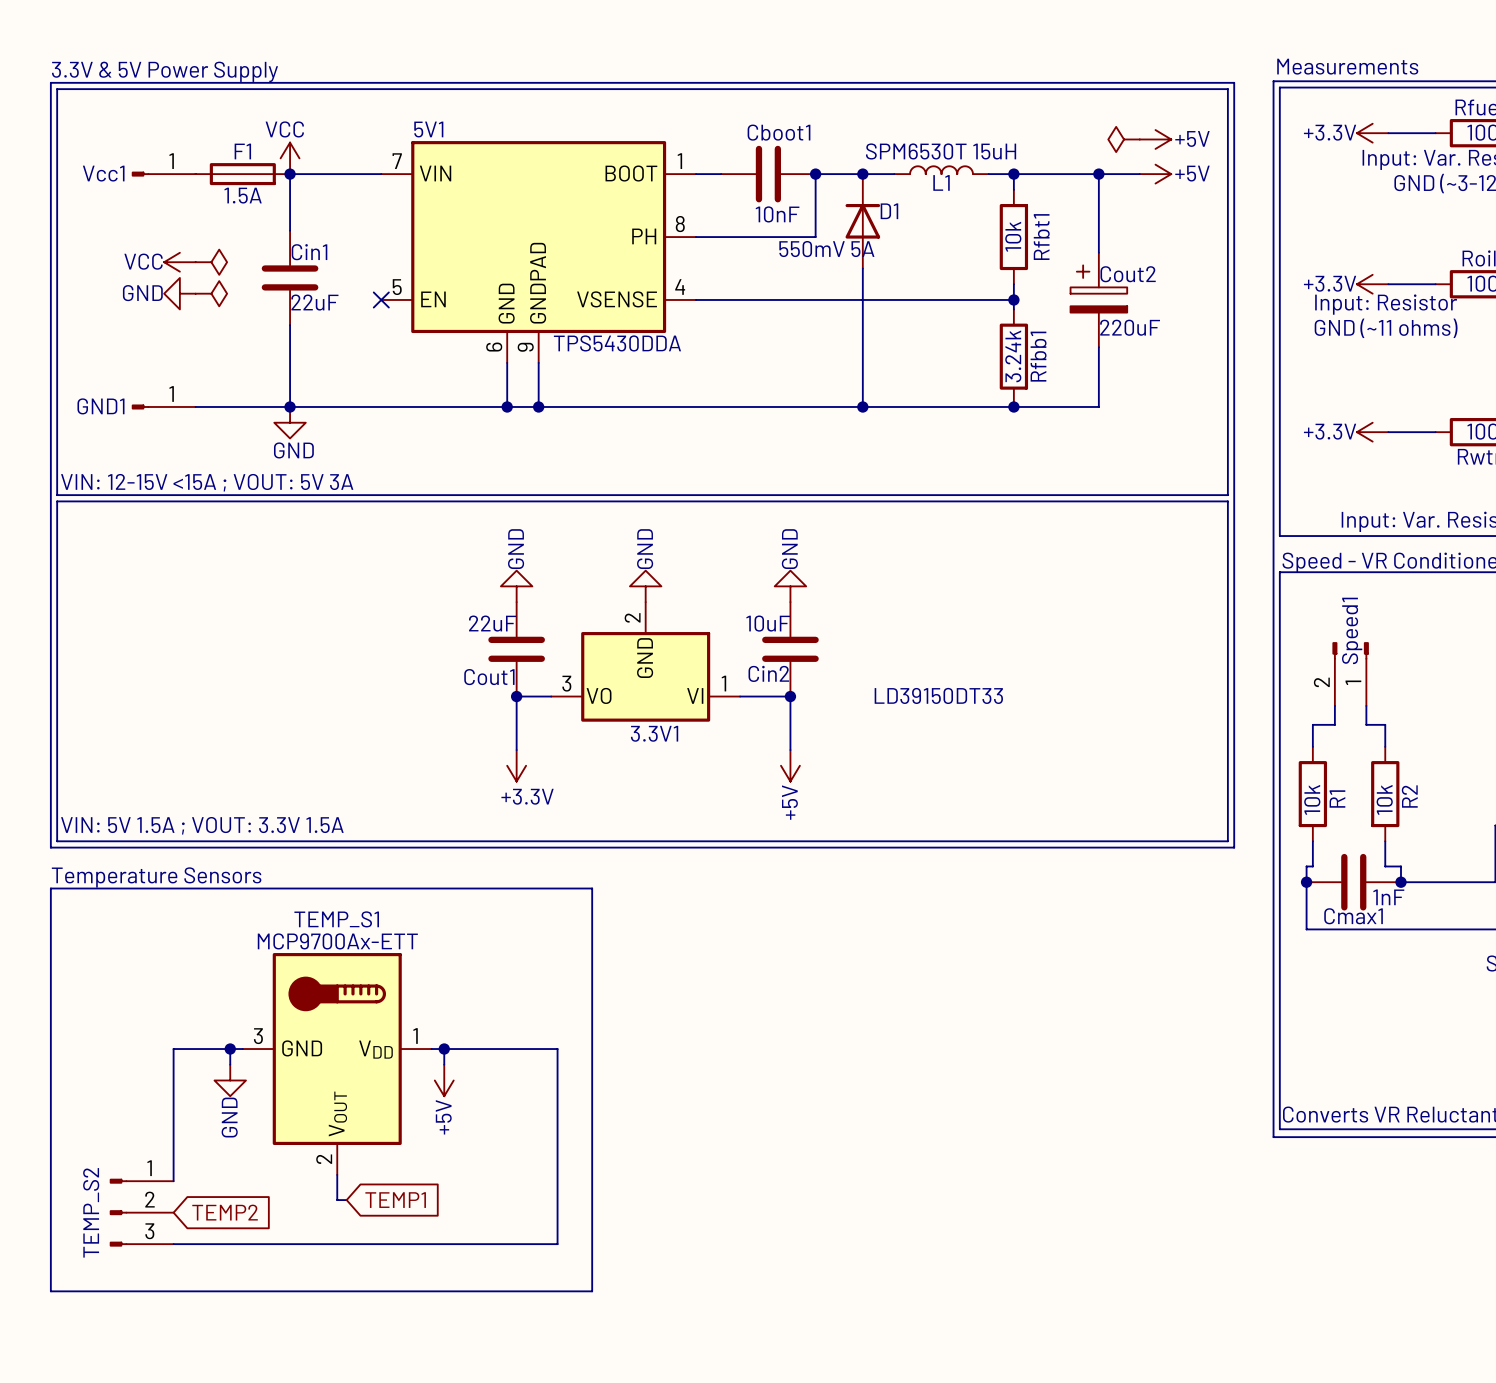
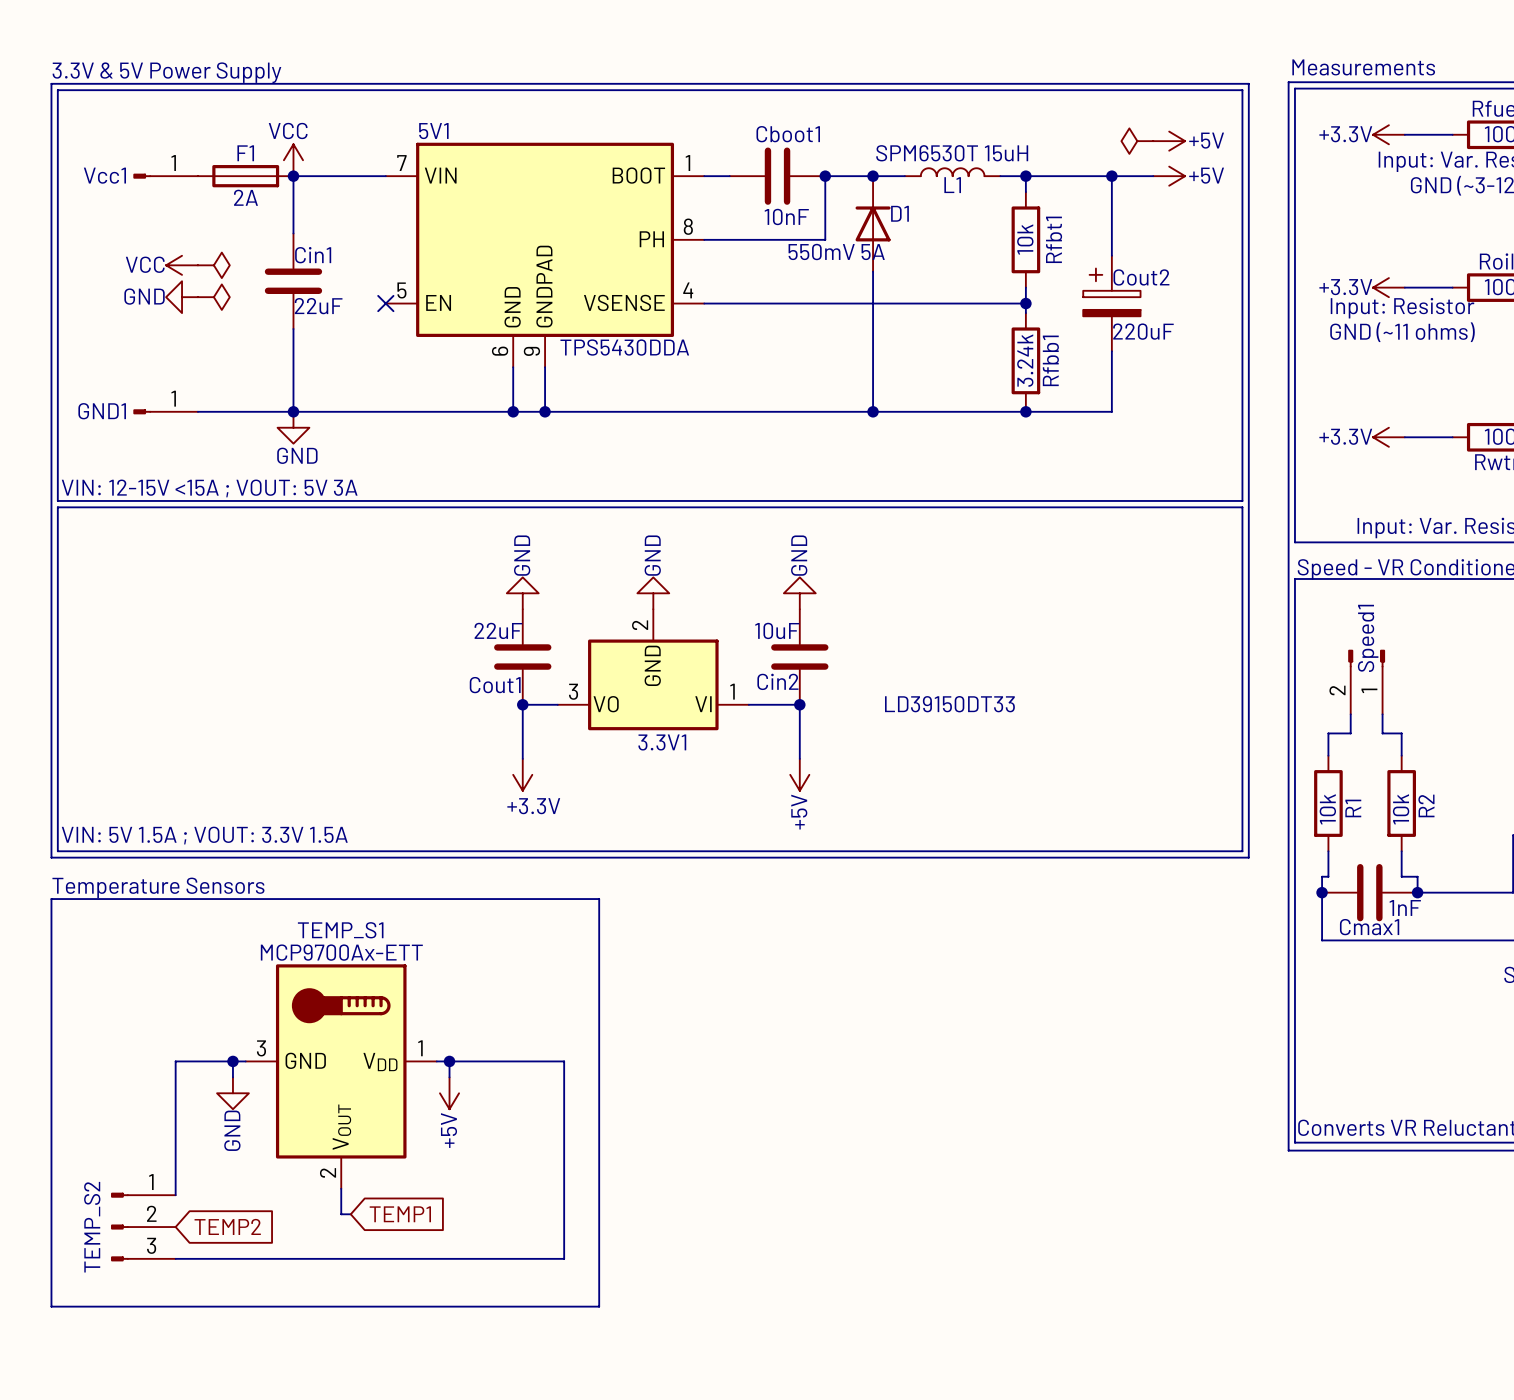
F1 value: 1.5A (243, 195) -> 2A (245, 197)

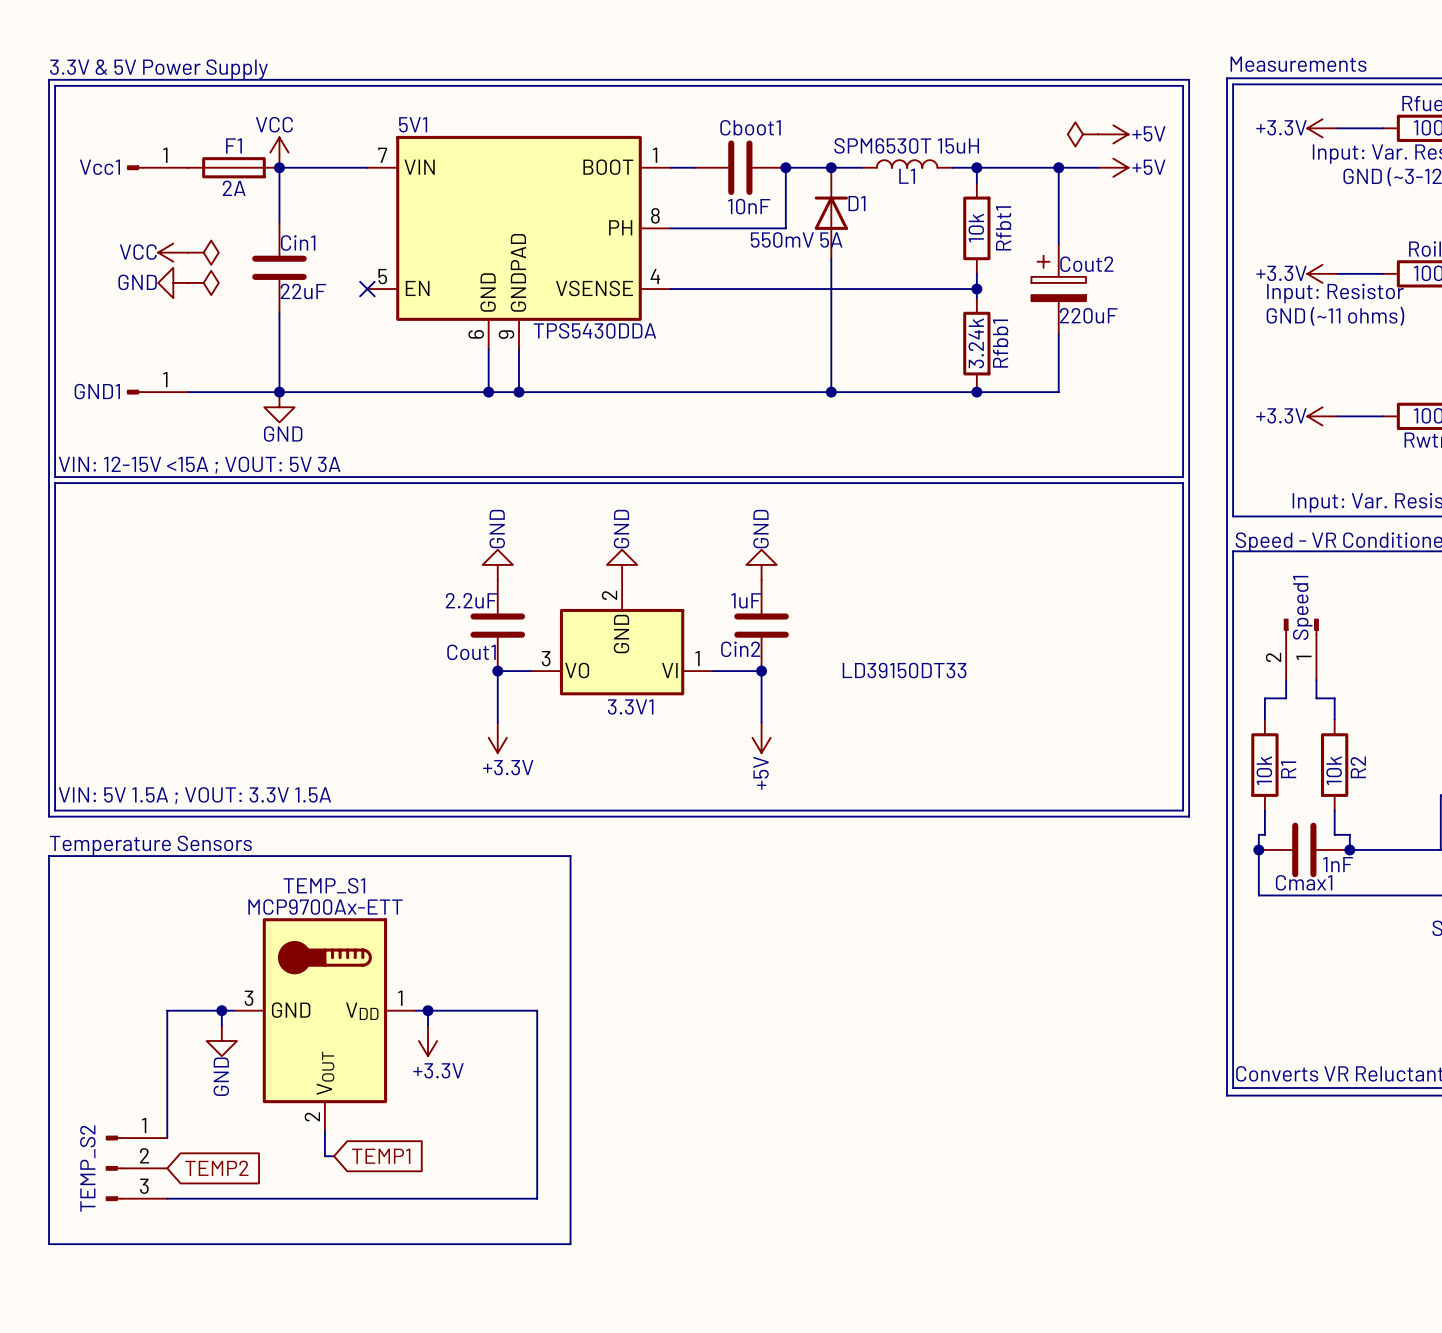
Cout1 value: 22uF (498, 630) -> 2.2uF (471, 600)
Cin2 value: 10uF (777, 630) -> 1uF (746, 600)
power symbol: +5V (449, 1093) -> +3.3V (428, 1041)

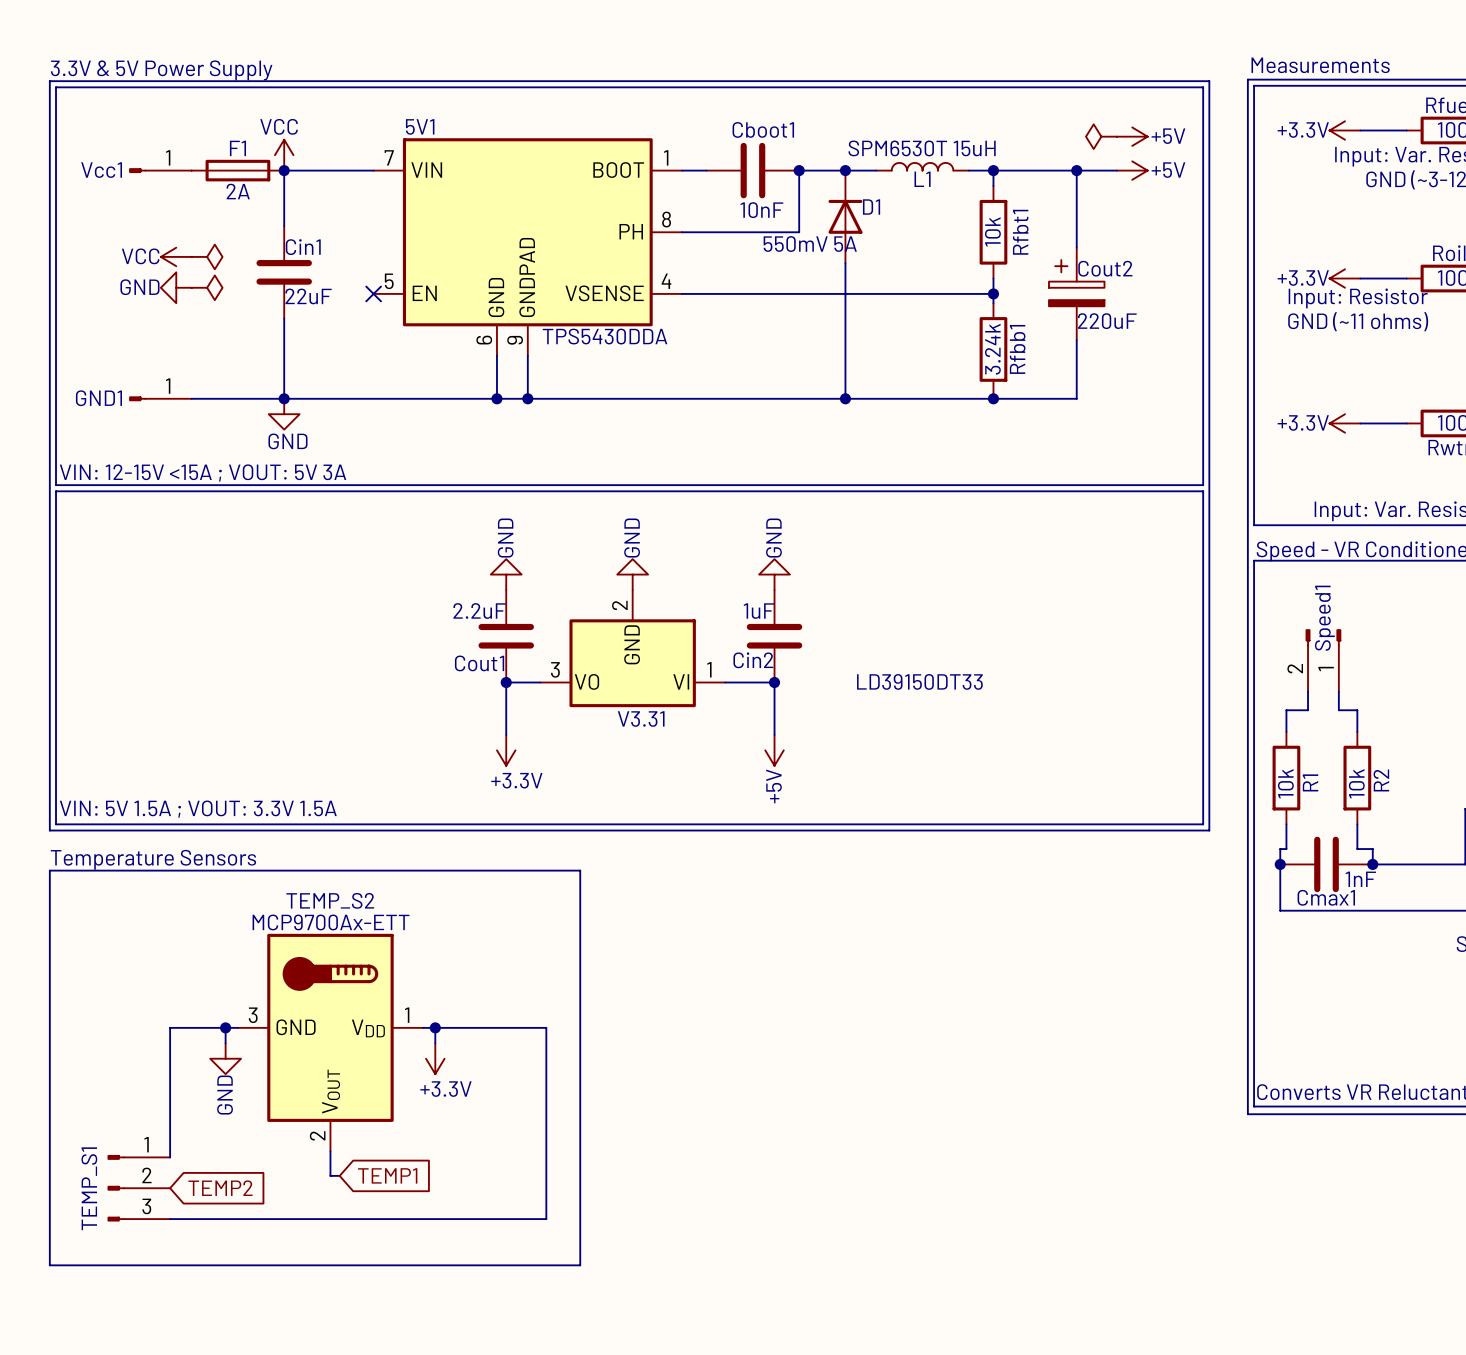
3.3V1 name: 3.3V1 (630, 706) -> V3.31 (641, 719)
TEMP_S1 name: TEMP_S1 (324, 885) -> TEMP_S2 (330, 900)
TEMP_S2 name: TEMP_S2 (87, 1168) -> TEMP_S1 (89, 1188)

